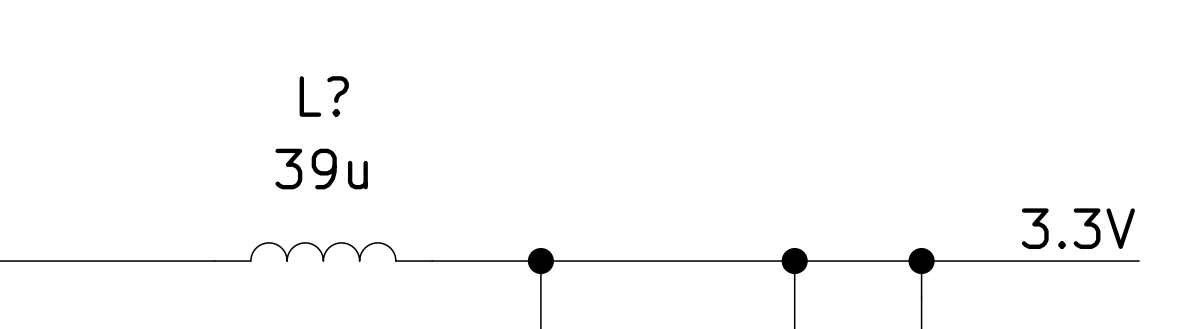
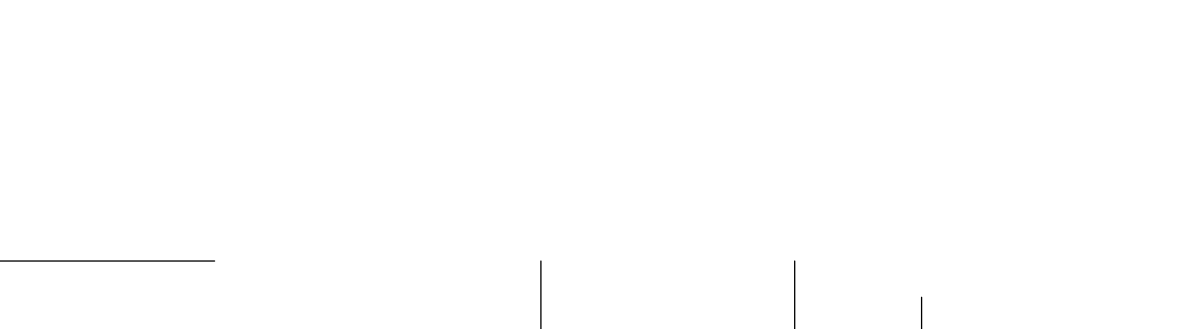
label: 3.3V (1078, 228) -> none
L?: 39u (323, 251) -> none
wire: (432, 261) (1139, 261) -> none
junction: (540, 261) -> none
junction: (794, 261) -> none
wire: (921, 261) (921, 297) -> none
junction: (921, 261) -> none

